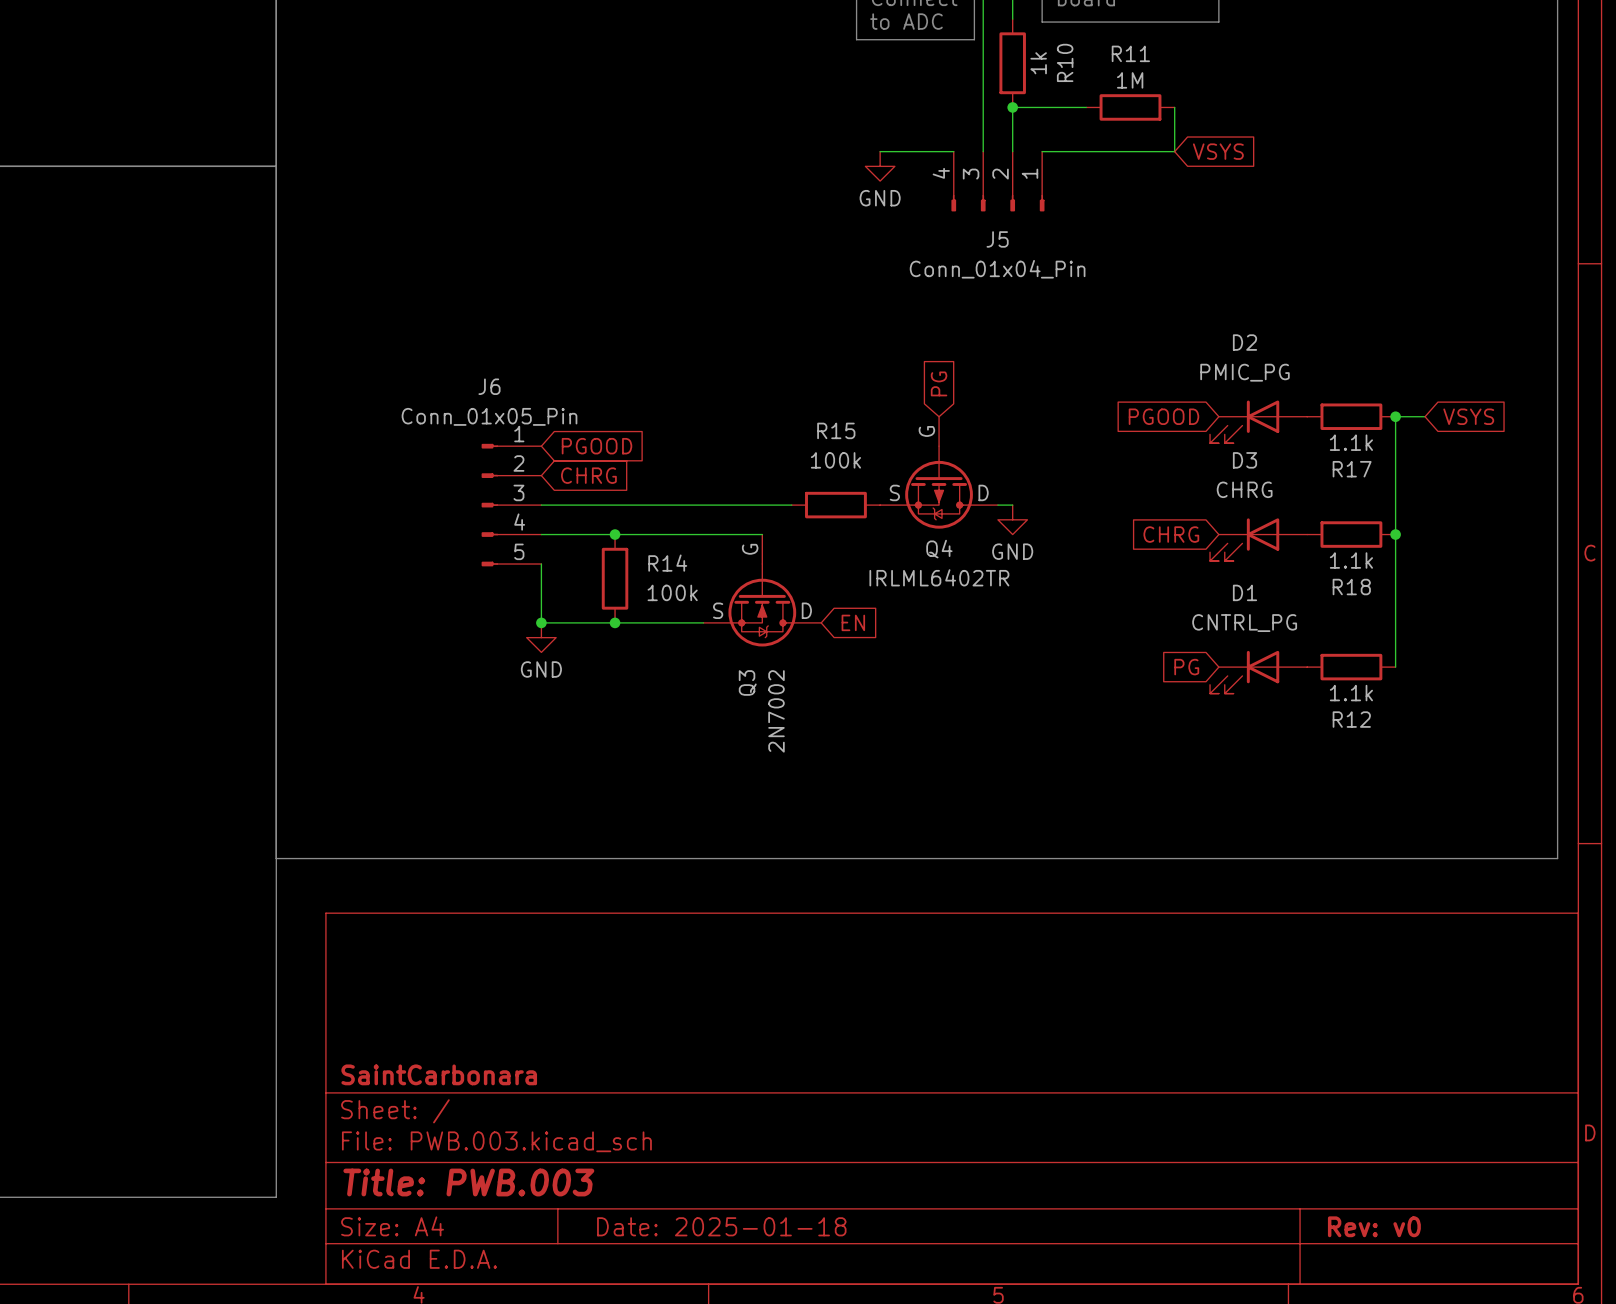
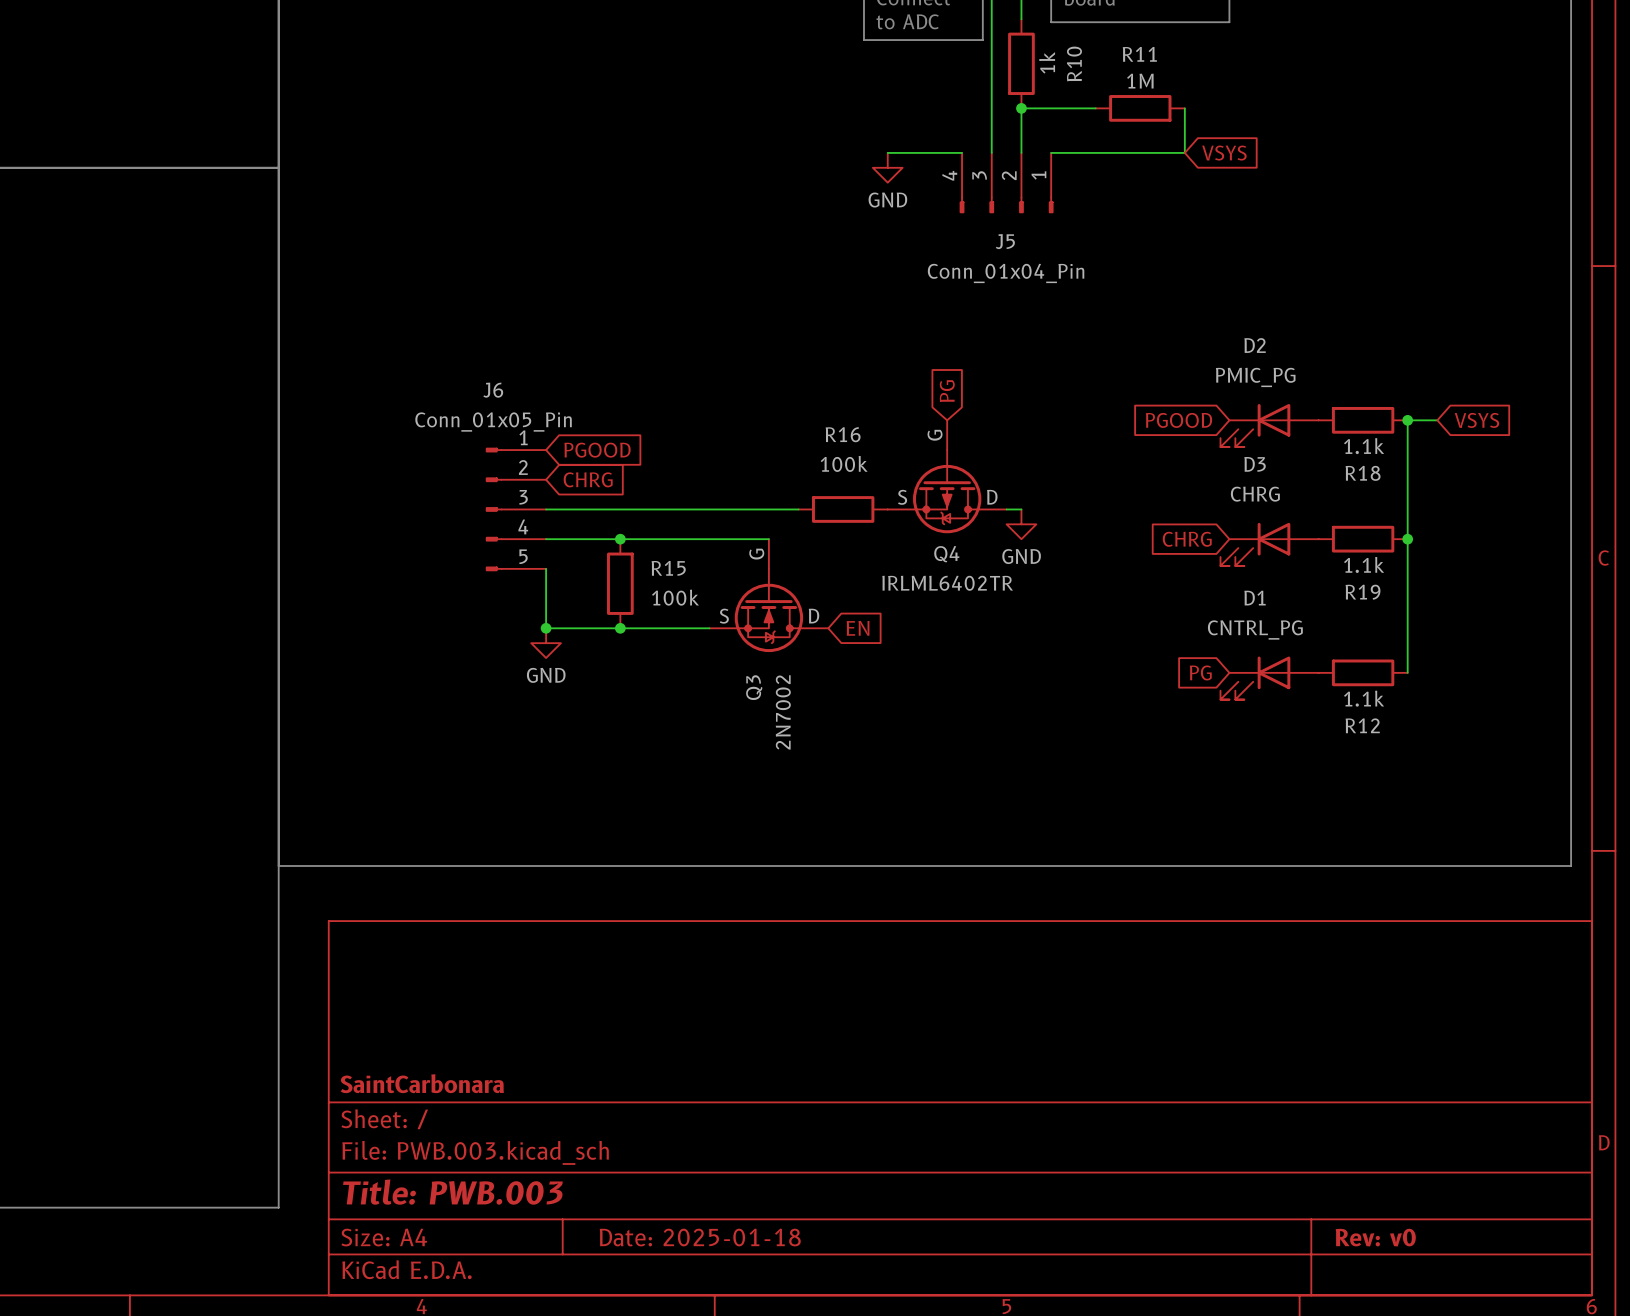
R15 name: R15 (836, 430) -> R16 (843, 434)
R17 name: R17 (1352, 469) -> R18 (1363, 473)
R14 name: R14 (667, 563) -> R15 (668, 568)
R18 name: R18 (1351, 587) -> R19 (1363, 592)

